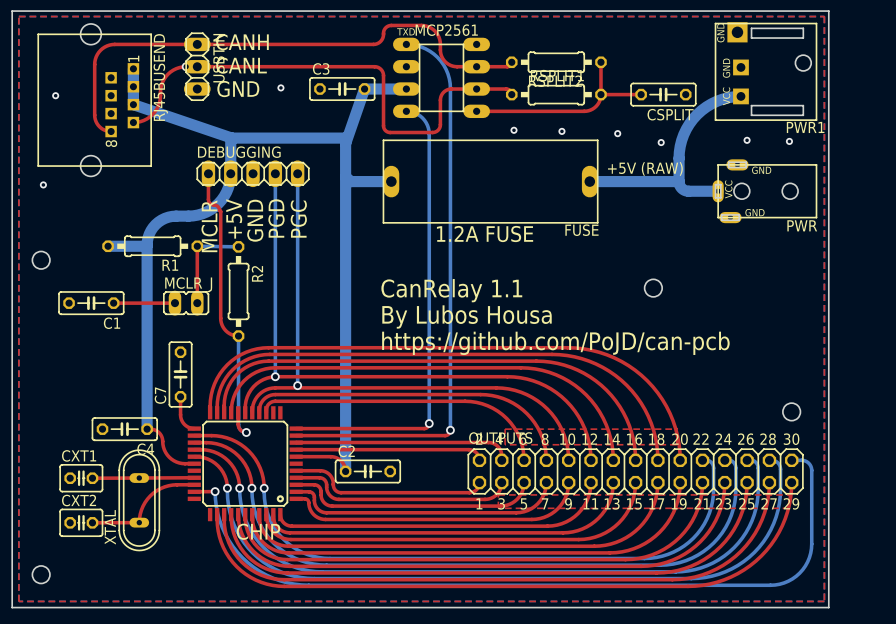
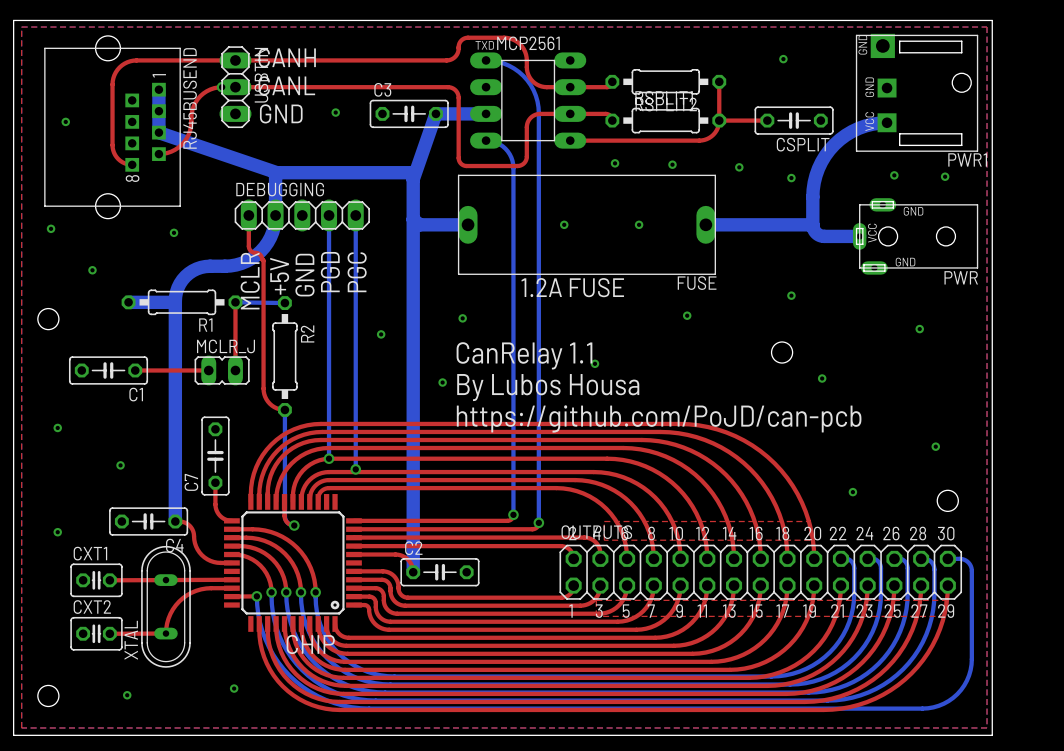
via: none -> (783, 59)
text: +5V (RAW) (645, 168) -> none
via: none -> (564, 224)
via: none -> (639, 224)
via: none -> (174, 232)
via: none -> (92, 270)
via: none -> (791, 295)
via: none -> (687, 315)
via: none -> (462, 318)
via: none -> (919, 329)
via: none -> (381, 334)
via: none -> (594, 363)
via: none -> (822, 378)
via: none -> (442, 382)
via: none -> (57, 427)
via: none -> (935, 446)
via: none -> (120, 465)
via: none -> (852, 492)
via: none -> (57, 532)
via: none -> (234, 688)
via: none -> (127, 695)

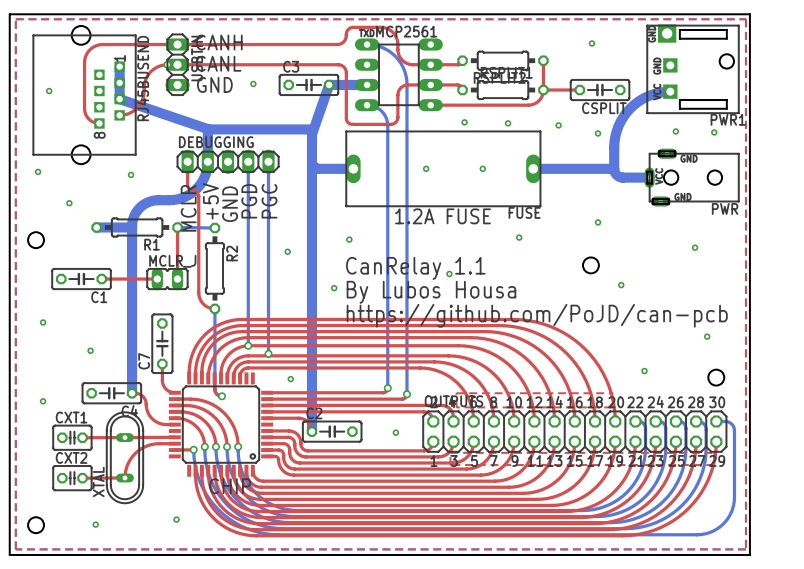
via: none -> (290, 379)
via: none -> (395, 432)

